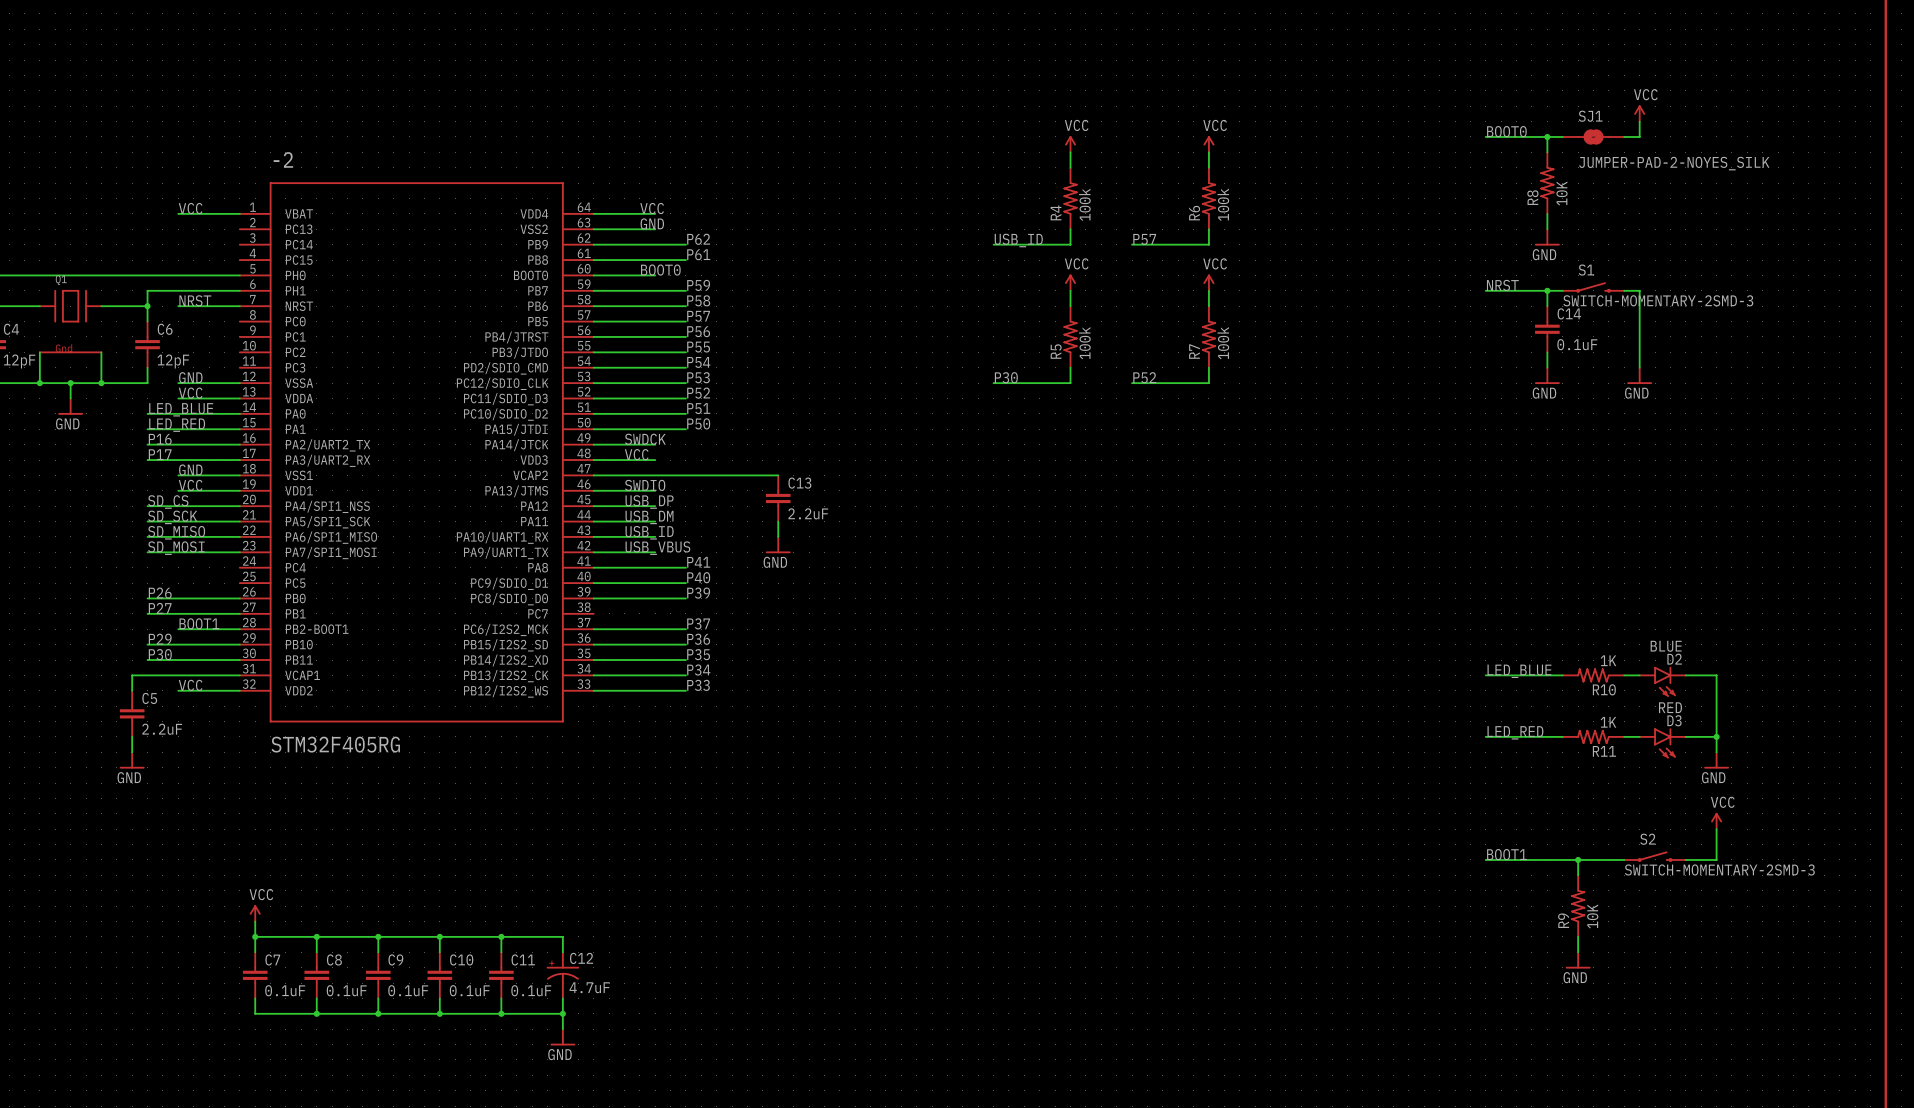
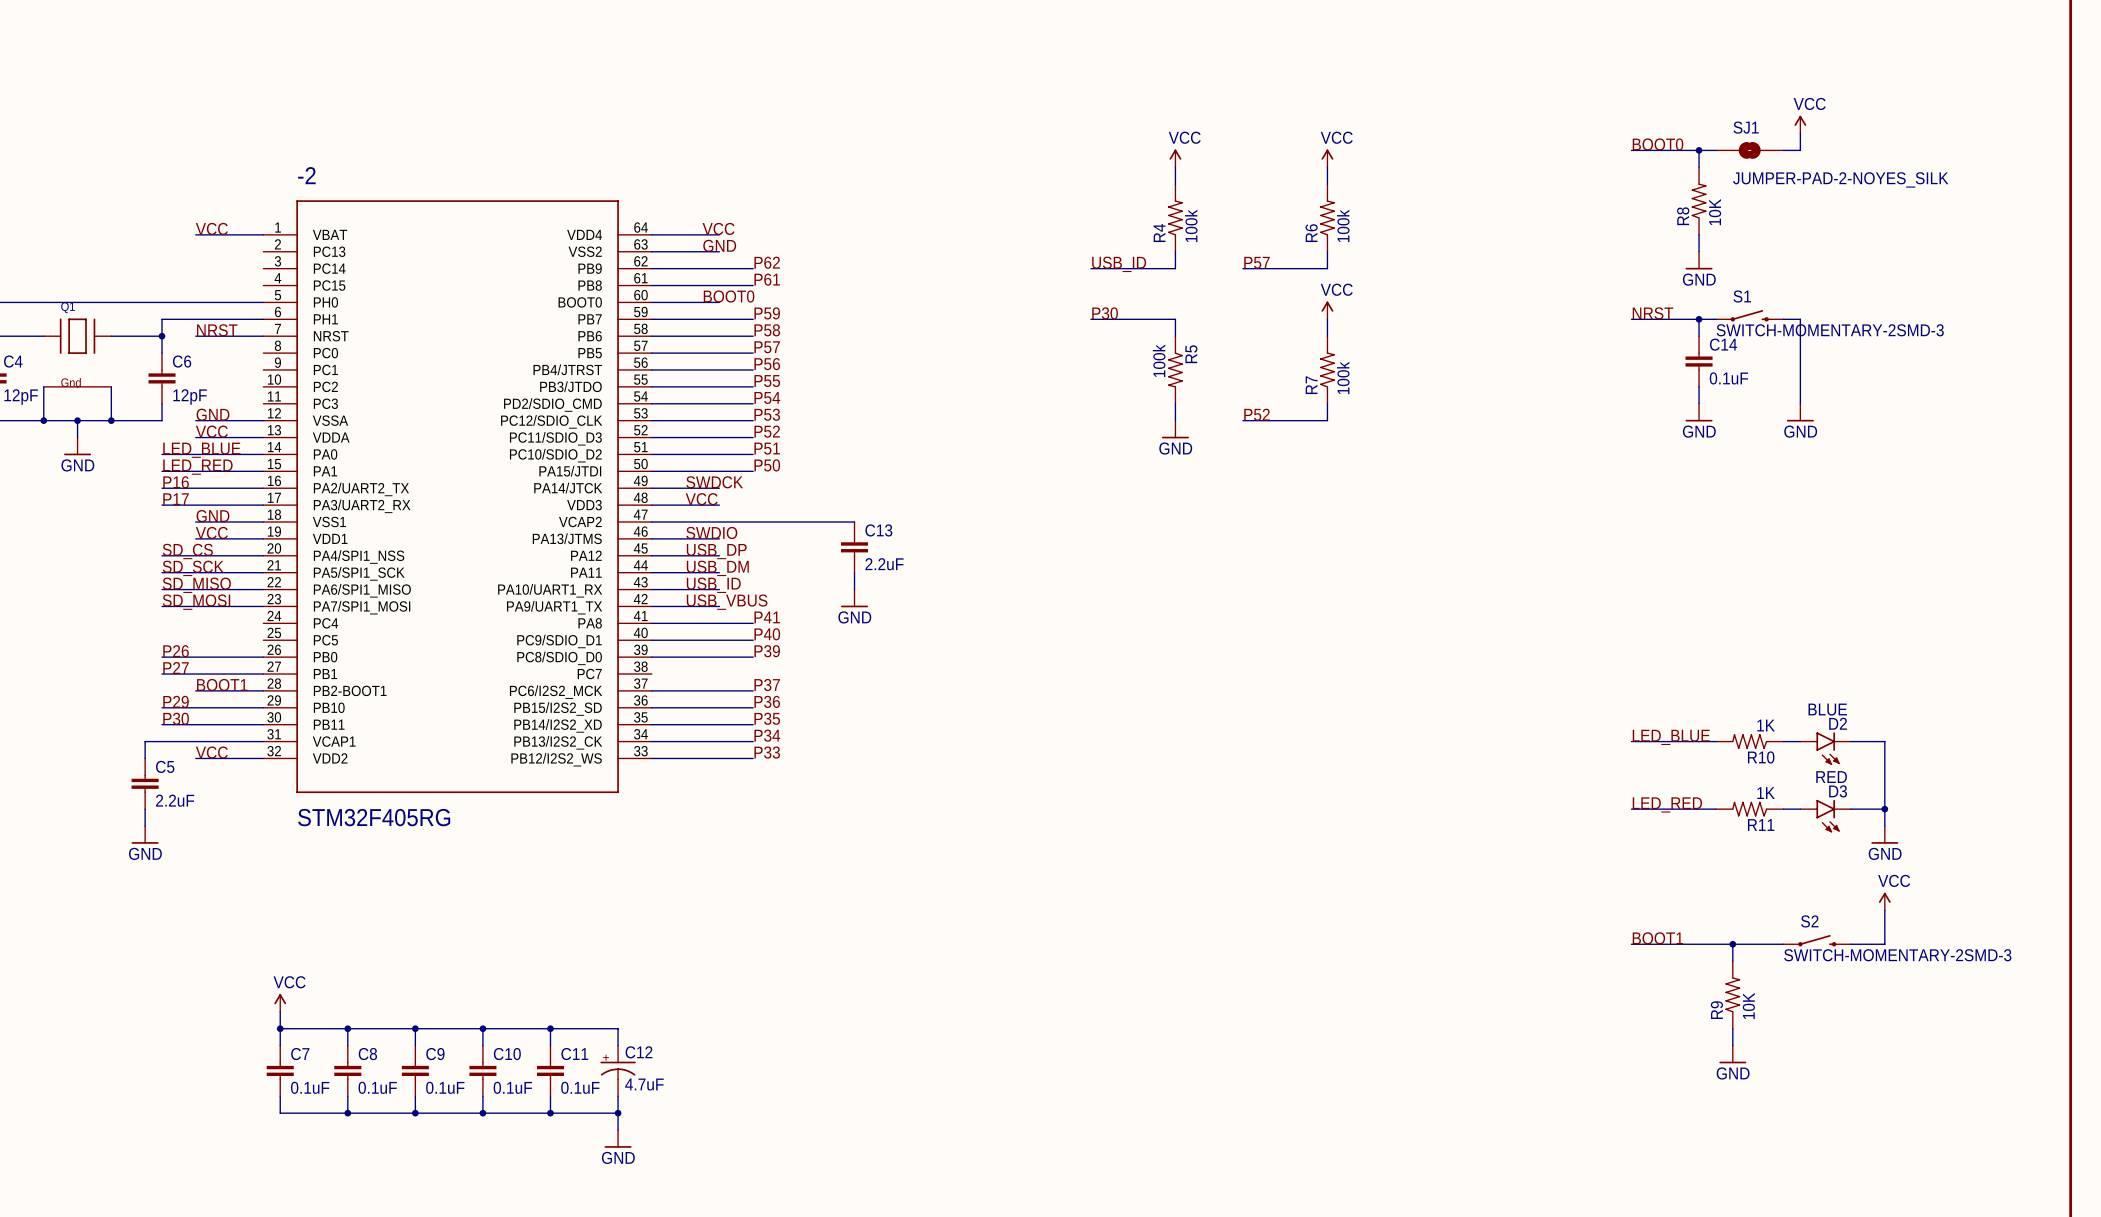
power symbol: VCC (1070, 282) -> none
R5 rotation: 0° (1070, 336) -> 180° (1175, 369)
label position: P30 (1006, 377) -> P30 (1105, 313)
wire: (993, 383) (1070, 383) -> (1090, 319) (1175, 319)
power symbol: none -> GND (1175, 429)

